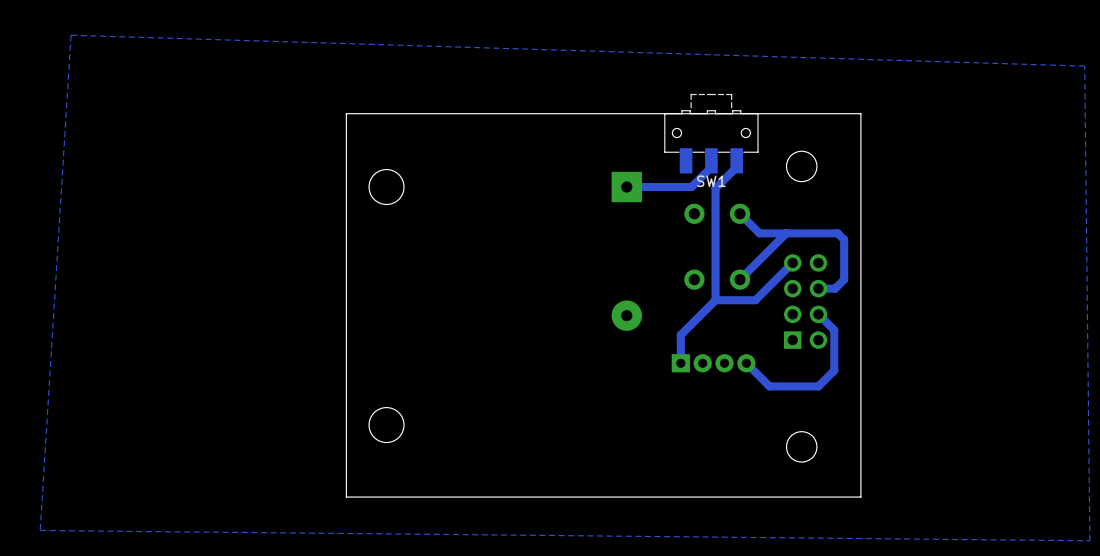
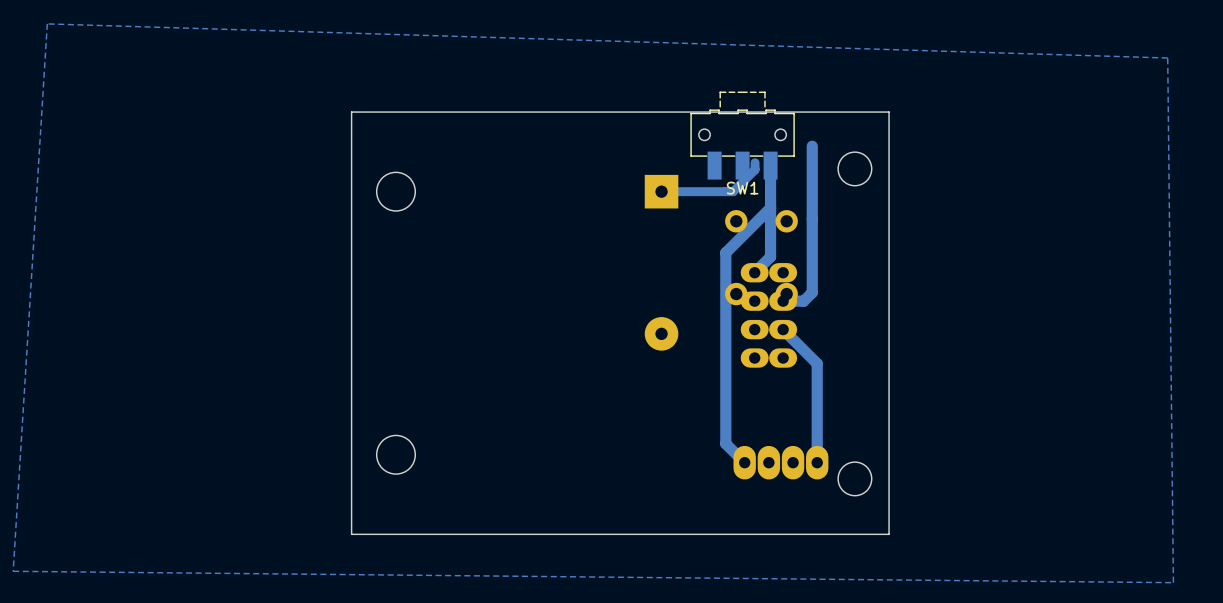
SW1 footprint: [664, 93, 759, 174] -> [690, 91, 795, 180]
board edge: (346, 114) (860, 113) (860, 497) (832, 497) -> (351, 112) (889, 112) (889, 534)
bottom track: none -> (812, 146) (812, 292) (803, 301) (783, 301)
bottom track: (736, 160) (736, 167) (715, 188) (715, 300) -> none
bottom track: none -> (770, 168) (770, 256) (754, 272)
bottom track: none -> (770, 208) (725, 252) (725, 443) (744, 462)
bottom track: (739, 213) (759, 233) (837, 233) (844, 239) (844, 279) (835, 288) (818, 288) -> none
bottom track: (786, 233) (739, 279) -> none
bottom track: (792, 262) (755, 300) (715, 300) -> none
part: none -> (768, 315)
bottom track: (715, 300) (680, 334) (680, 363) -> none
part: (805, 301) -> none
bottom track: none -> (783, 329) (817, 363) (817, 462)
bottom track: (818, 314) (834, 330) (834, 370) (818, 386) (769, 386) (746, 363) -> none
part: (713, 363) -> none
part: none -> (780, 462)

